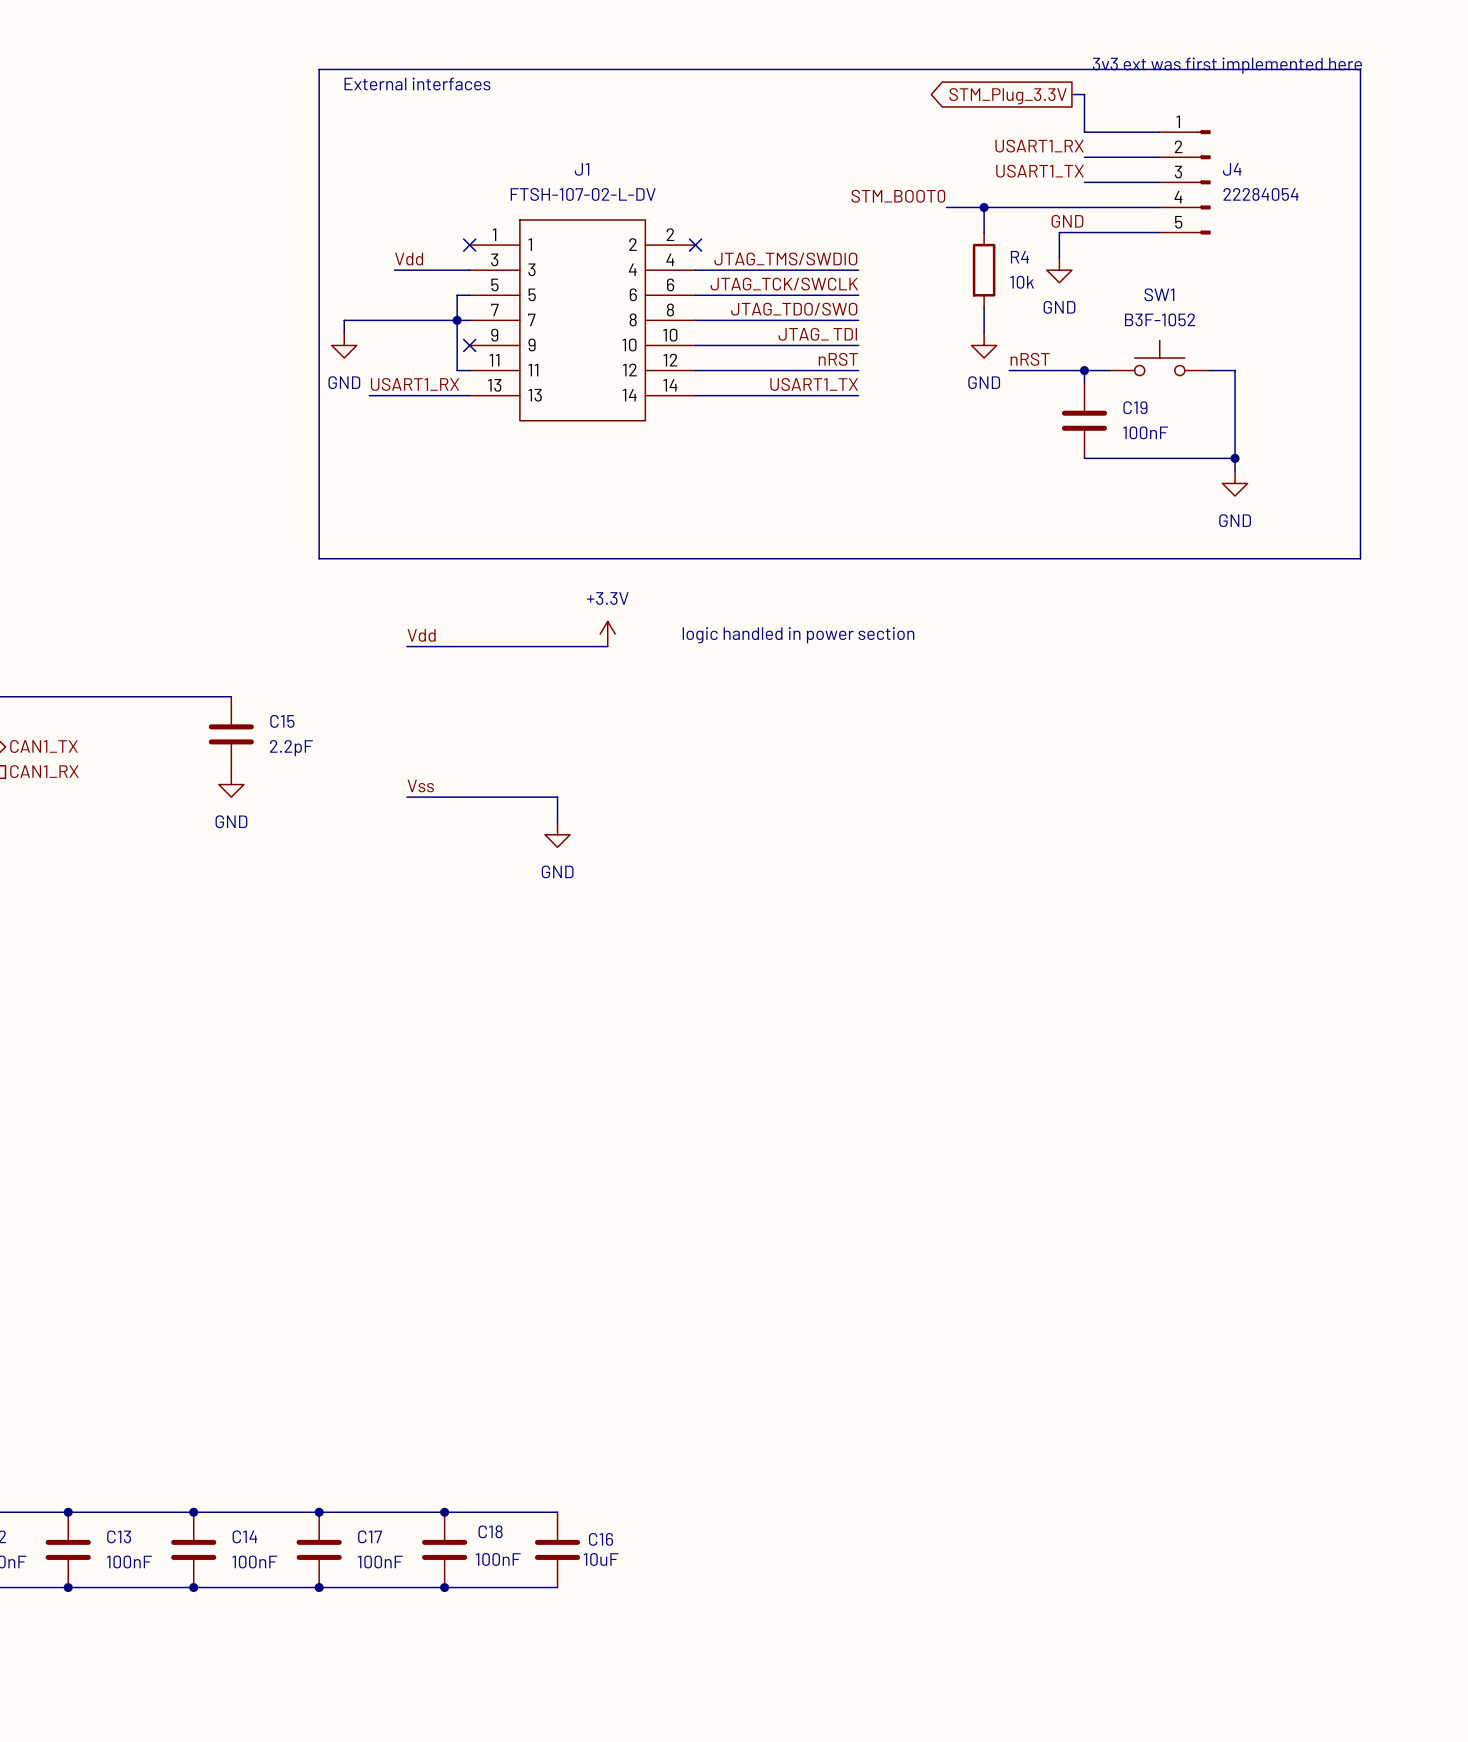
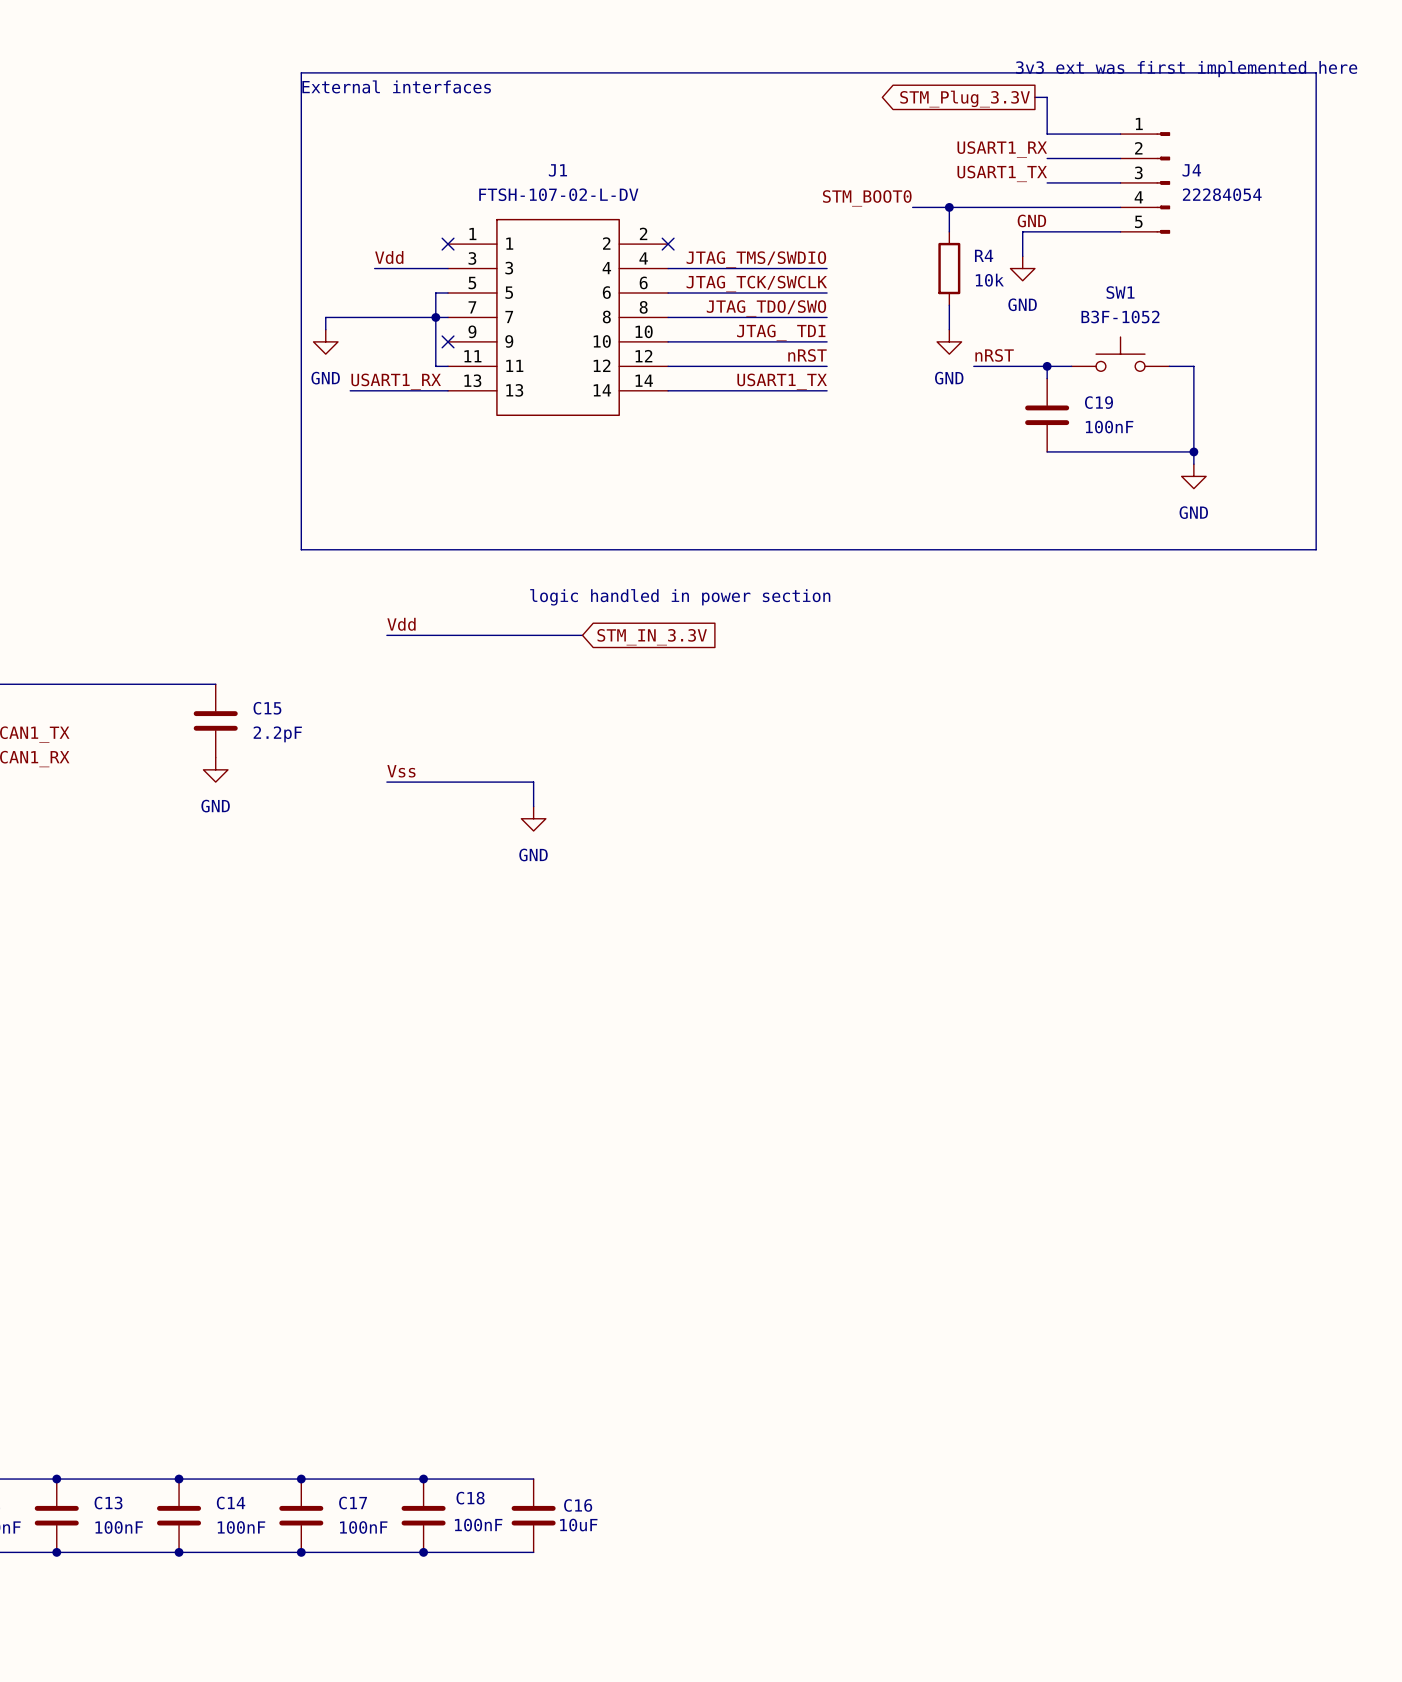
power symbol: +3.3V (607, 634) -> none
text position: logic handled in power section (798, 635) -> logic handled in power section (680, 597)
global label: none -> STM_IN_3.3V (652, 637)

